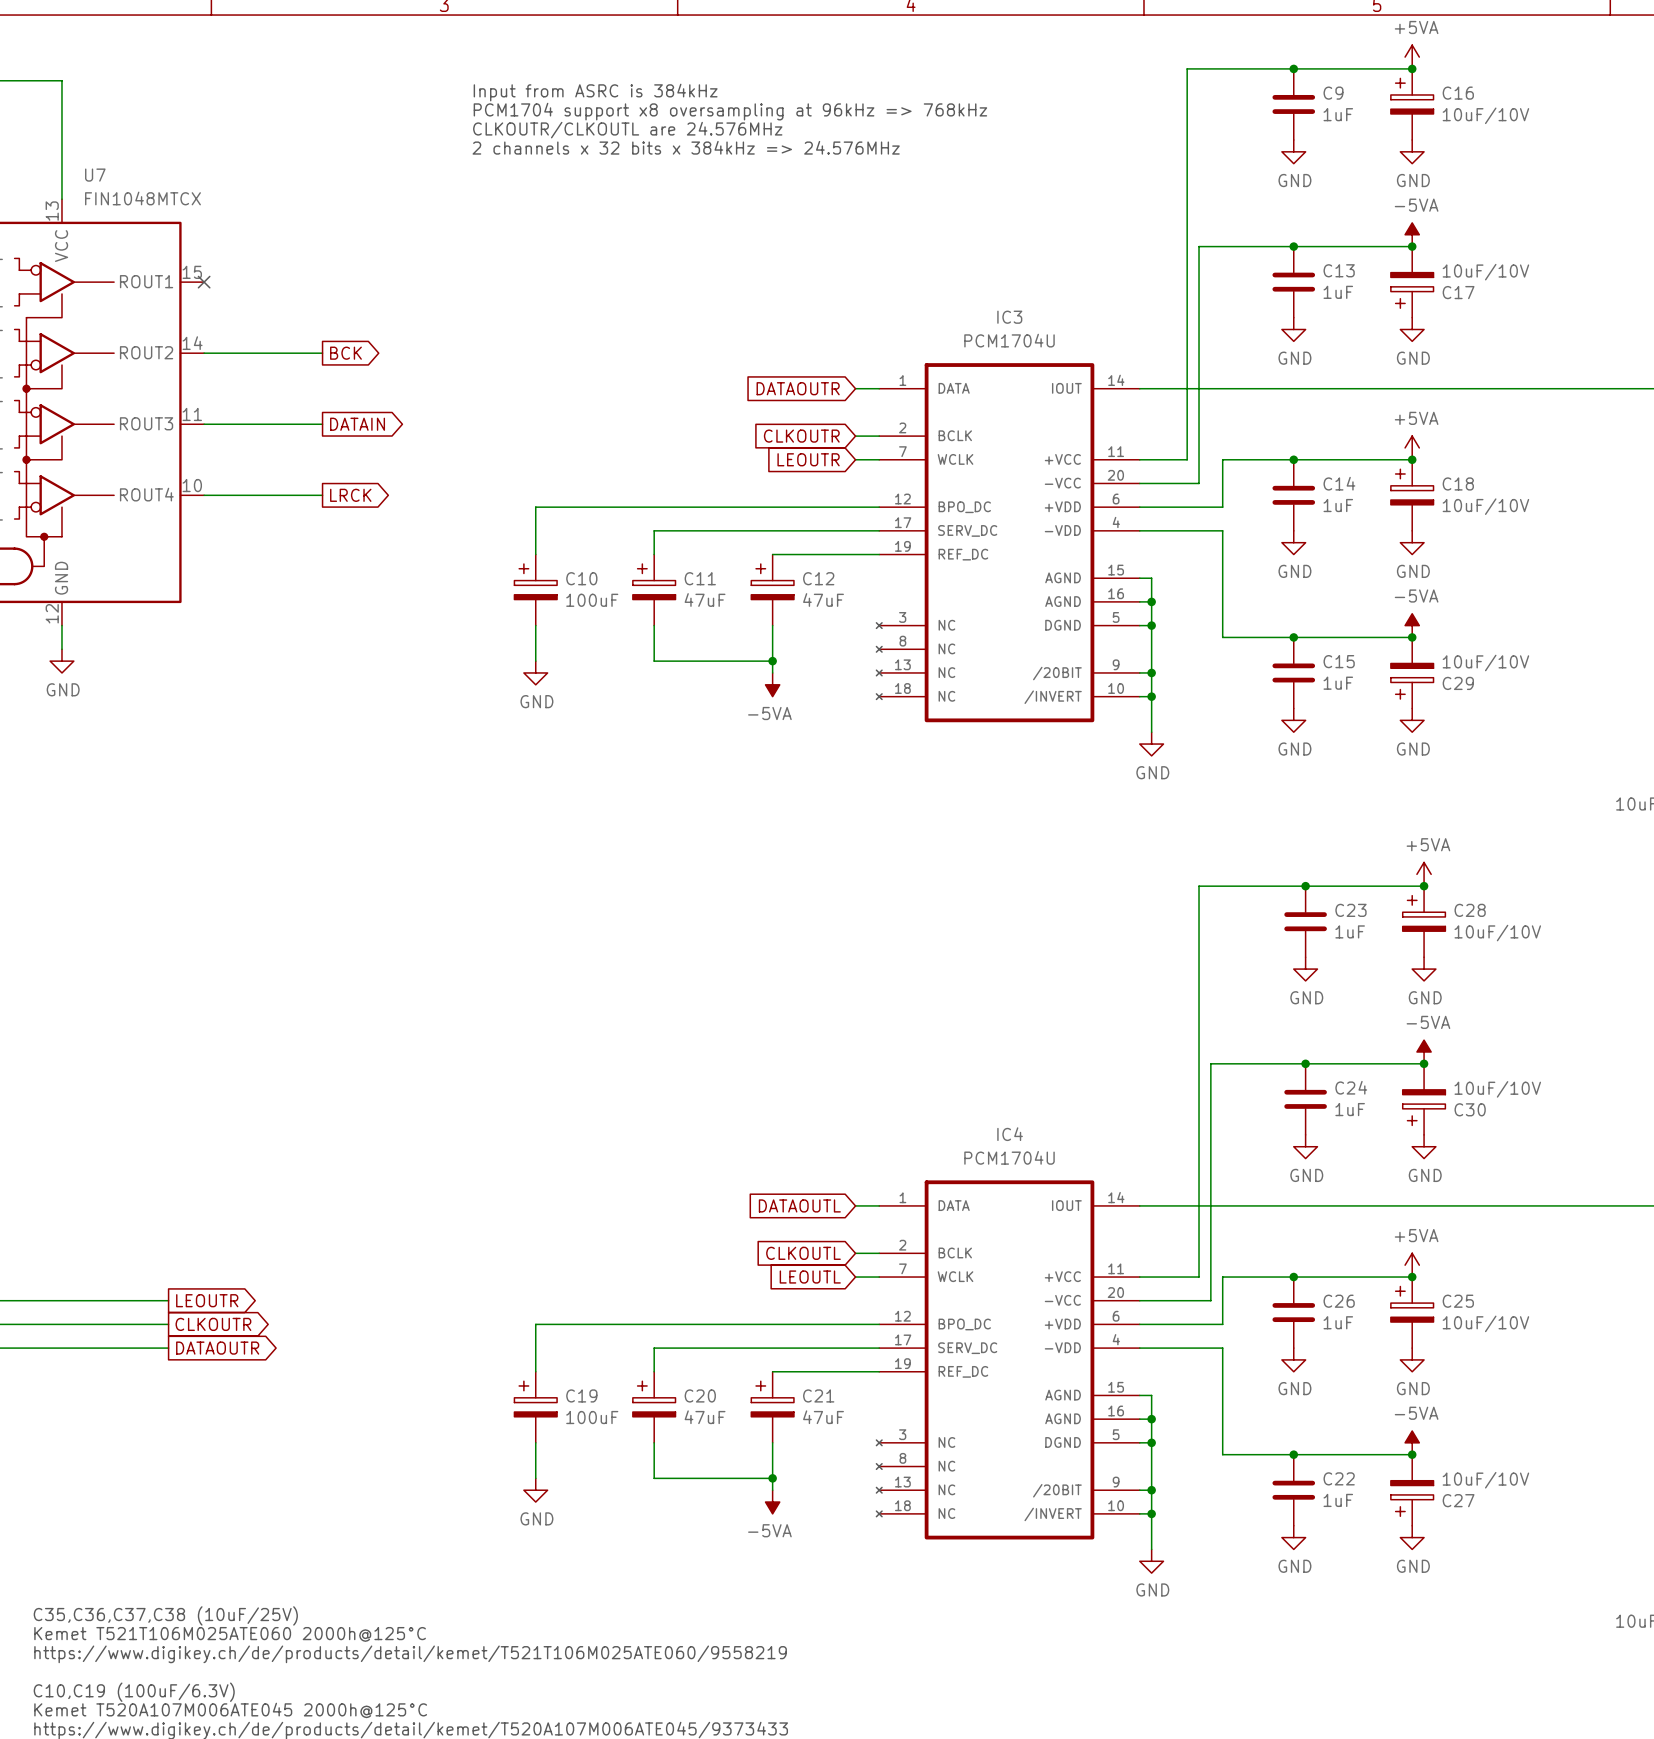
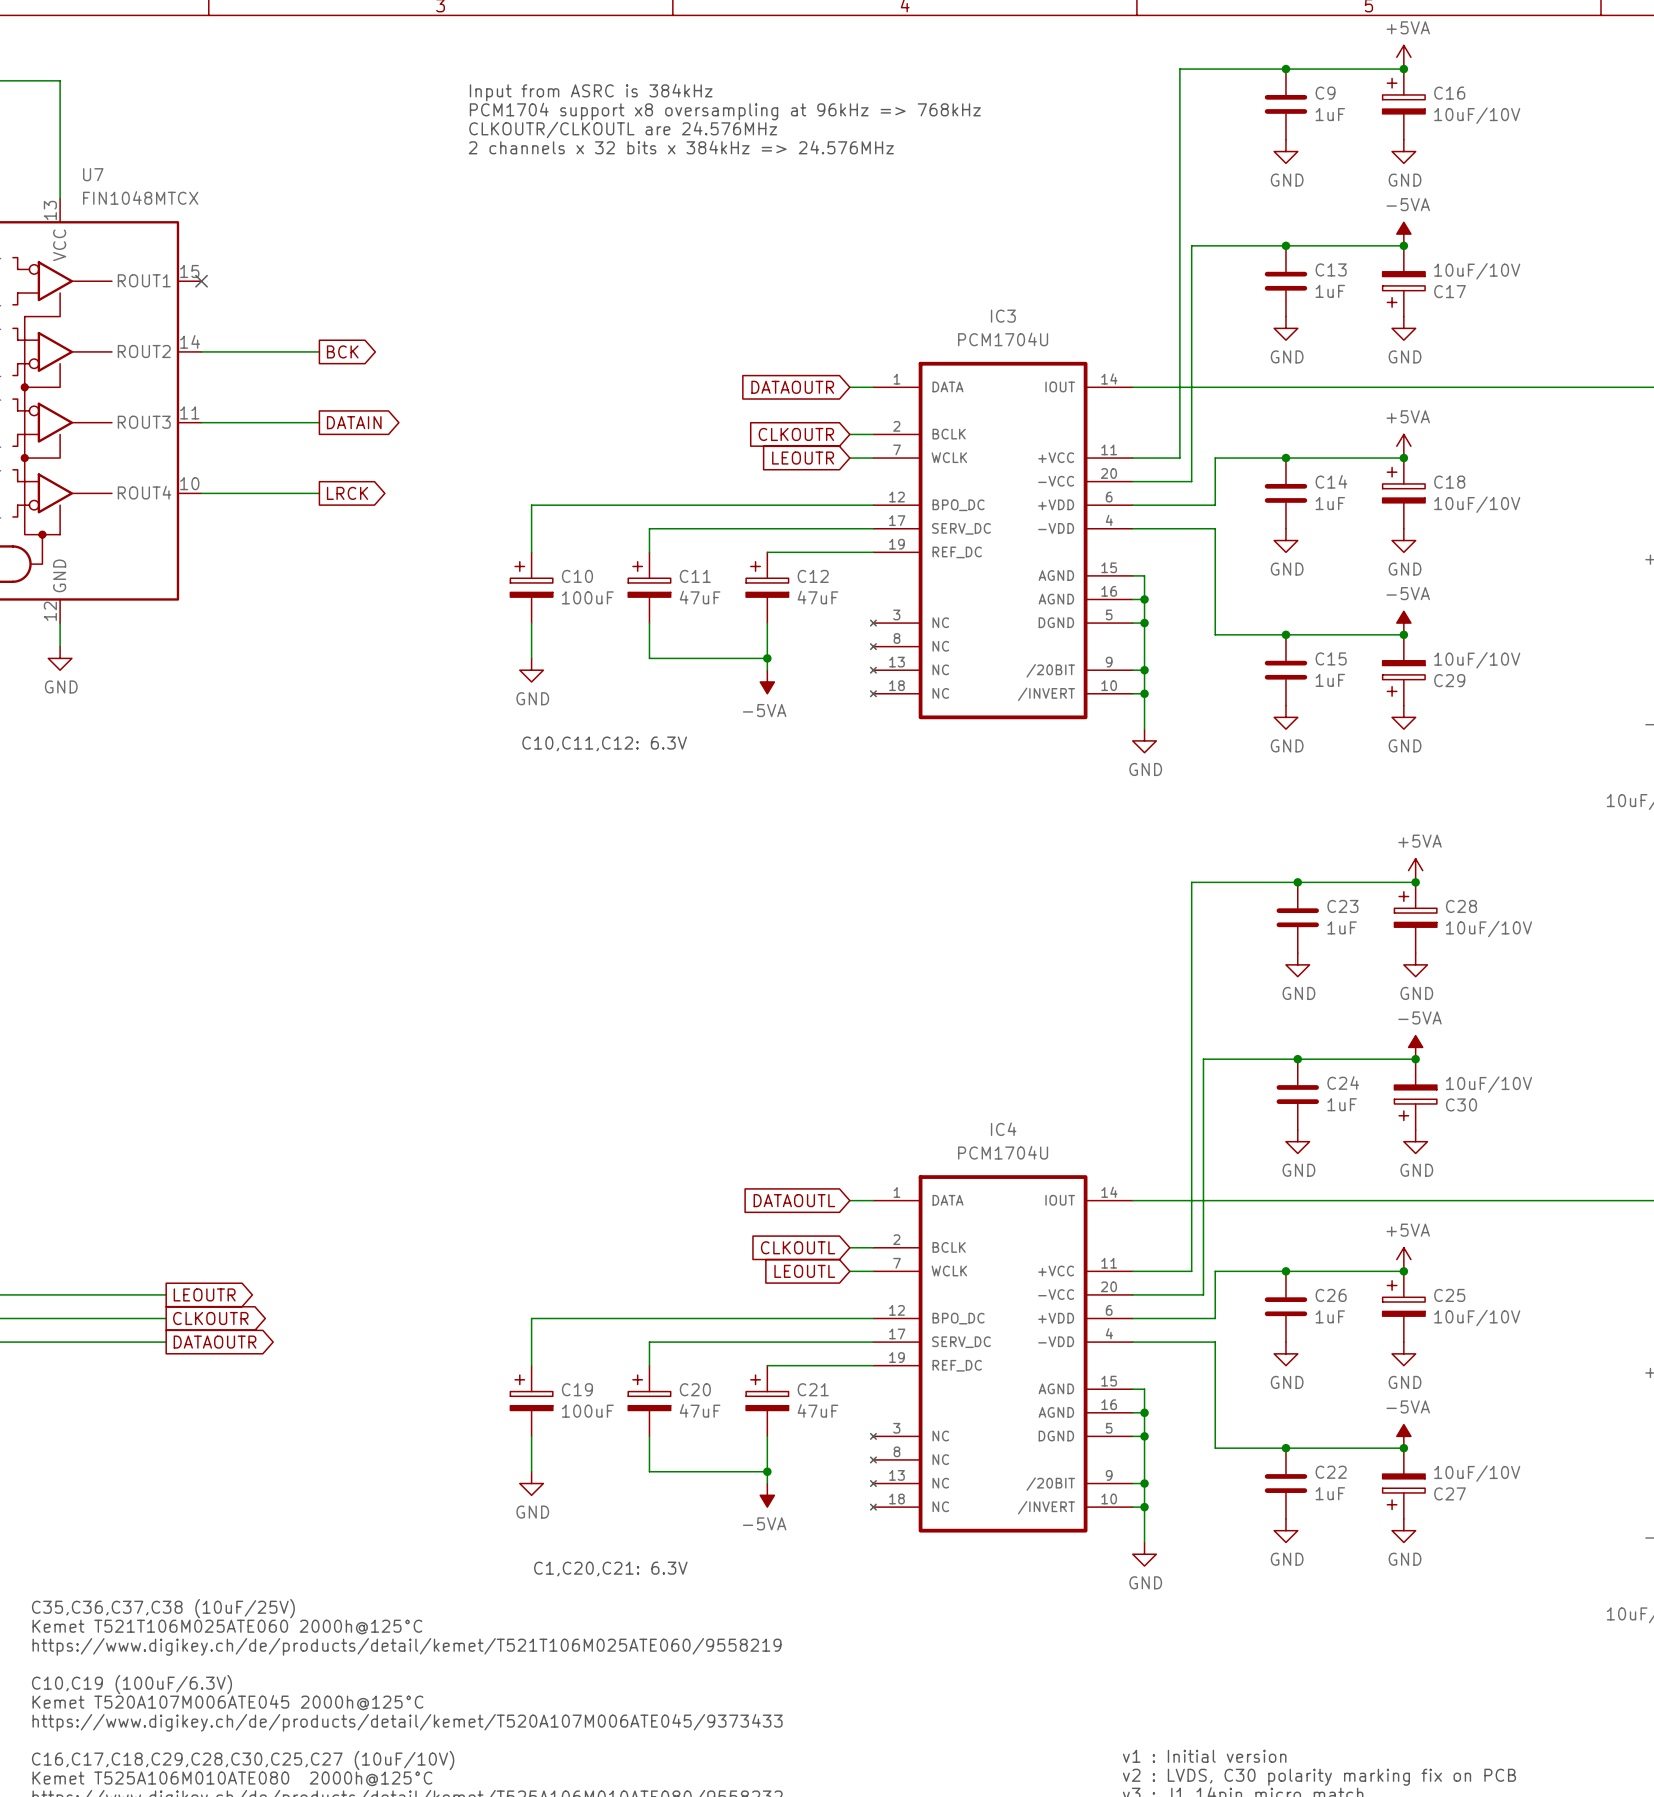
text: none -> C10,C11,C12: 6.3V (604, 743)
text: none -> C1,C20,C21: 6.3V (610, 1569)

